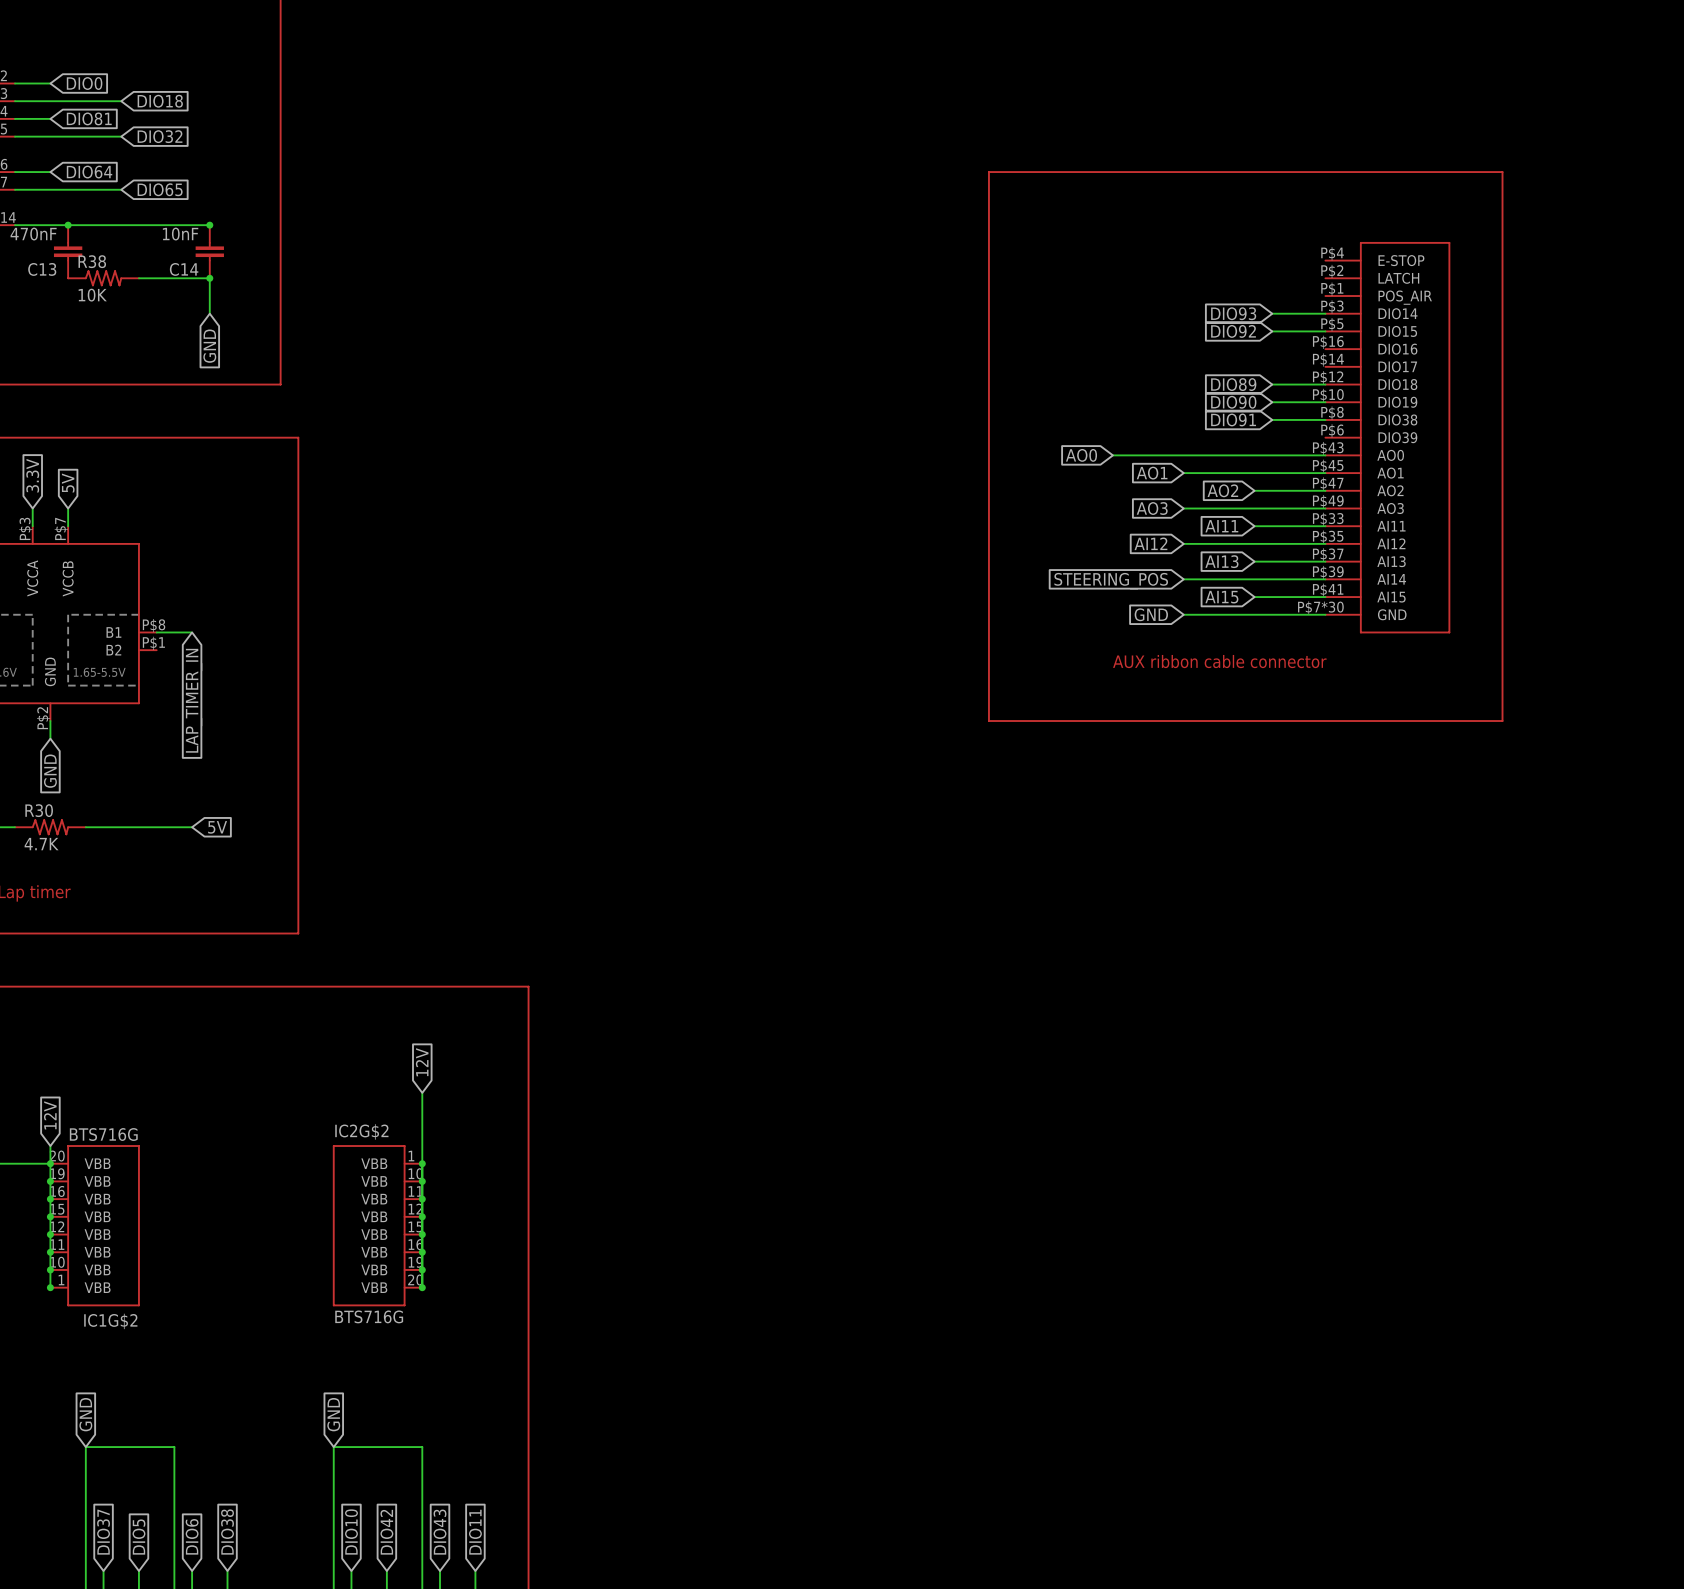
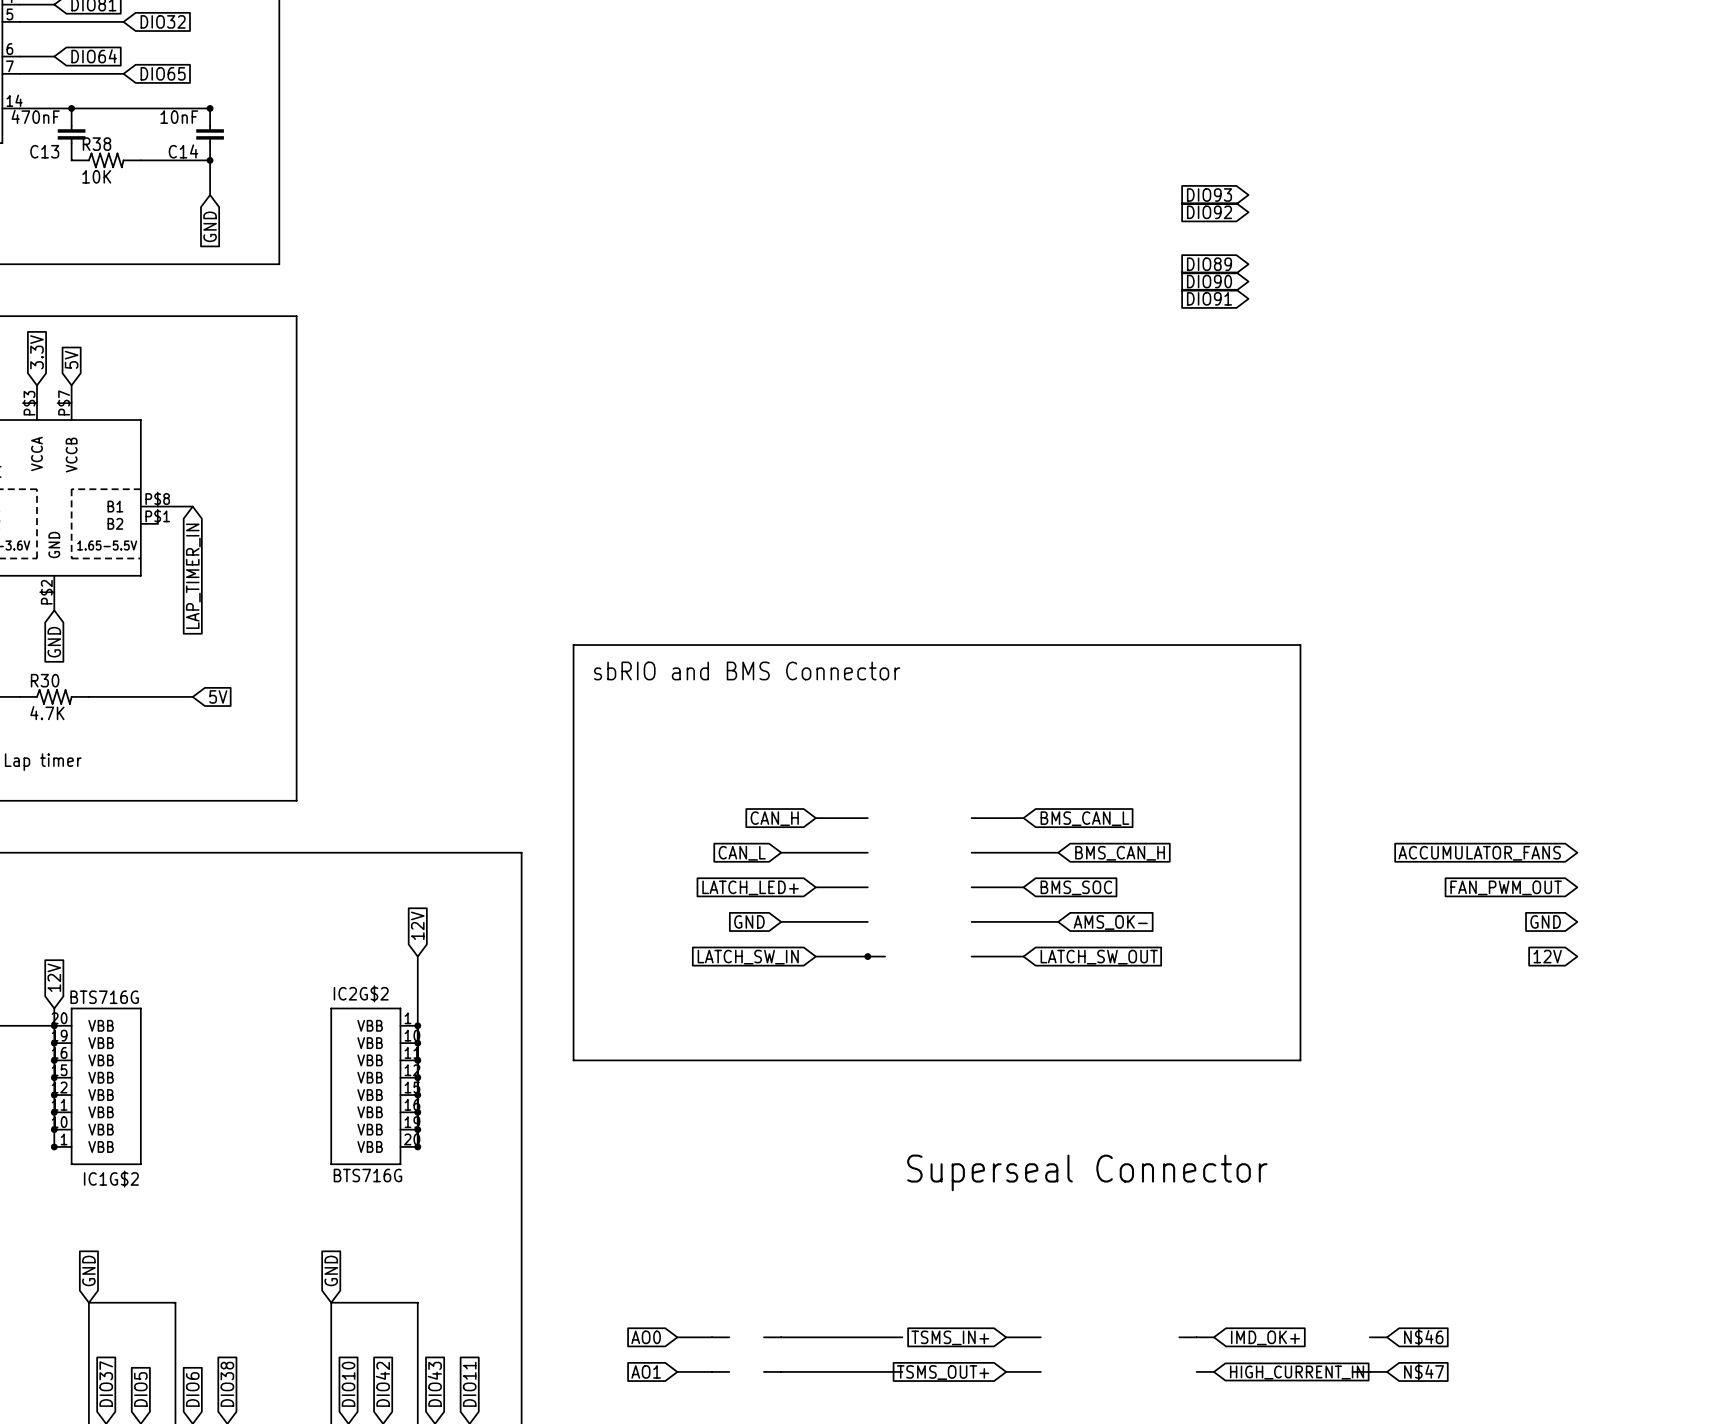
line: (988, 172) (1502, 172) (1502, 721) (988, 721) (988, 172) -> none
wire: (1272, 313) (1325, 313) -> none
wire: (1272, 331) (1325, 331) -> none
wire: (1272, 384) (1325, 384) -> none
wire: (1272, 402) (1325, 402) -> none
wire: (1272, 419) (1325, 419) -> none
part: (1387, 437) -> none
global label: AO0 (1081, 455) -> none
wire: (1112, 455) (1325, 455) -> none
global label: AO1 (1152, 473) -> none
wire: (1183, 473) (1325, 473) -> none
global label: AO2 (1222, 490) -> none
wire: (1254, 490) (1325, 490) -> none
global label: AO3 (1152, 508) -> none
wire: (1183, 508) (1325, 508) -> none
global label: AI11 (1221, 526) -> none
wire: (1254, 526) (1325, 526) -> none
global label: AI12 (1150, 543) -> none
wire: (1183, 543) (1325, 543) -> none
global label: AI13 (1221, 561) -> none
wire: (1254, 561) (1325, 561) -> none
wire: (1183, 579) (1325, 579) -> none
global label: STEERING_POS (1111, 581) -> none
global label: AI15 (1221, 597) -> none
wire: (1254, 597) (1325, 597) -> none
global label: GND (1151, 614) -> none
wire: (1183, 614) (1325, 614) -> none
text: AUX ribbon cable connector (1219, 661) -> none
line: none -> (573, 645) (1300, 645) (1300, 1060) (573, 1060) (573, 645)
text: none -> sbRIO and BMS Connector (747, 670)
wire: none -> (815, 818) (867, 818)
wire: none -> (971, 818) (1023, 818)
global label: none -> CAN_H (774, 818)
global label: none -> BMS_CAN_L (1084, 818)
wire: none -> (781, 852) (867, 852)
wire: none -> (971, 852) (1058, 852)
global label: none -> CAN_L (742, 853)
global label: none -> BMS_CAN_H (1120, 853)
global label: none -> ACCUMULATOR_FANS (1479, 853)
wire: none -> (815, 887) (867, 887)
wire: none -> (971, 887) (1023, 887)
global label: none -> LATCH_LED+ (750, 887)
global label: none -> BMS_SOC (1076, 887)
global label: none -> FAN_PWM_OUT (1506, 887)
global label: none -> GND (749, 921)
wire: none -> (781, 921) (867, 921)
wire: none -> (971, 921) (1058, 921)
global label: none -> GND (1545, 921)
global label: none -> AMS_OK- (1110, 922)
wire: none -> (815, 956) (885, 956)
junction: none -> (867, 956)
wire: none -> (971, 956) (1023, 956)
global label: none -> 12V (1547, 956)
global label: none -> LATCH_SW_IN (748, 957)
global label: none -> LATCH_SW_OUT (1099, 957)
text: none -> Superseal Connector (1087, 1172)
global label: none -> AO0 (646, 1337)
wire: none -> (677, 1337) (729, 1337)
wire: none -> (763, 1337) (902, 1337)
wire: none -> (1006, 1337) (1040, 1337)
wire: none -> (1179, 1337) (1213, 1337)
wire: none -> (1369, 1337) (1387, 1337)
global label: none -> N$46 (1423, 1337)
global label: none -> TSMS_IN+ (950, 1337)
global label: none -> IMD_OK+ (1265, 1337)
global label: none -> AO1 (646, 1371)
wire: none -> (677, 1371) (729, 1371)
wire: none -> (763, 1371) (902, 1371)
wire: none -> (1006, 1371) (1040, 1371)
wire: none -> (1196, 1371) (1213, 1371)
wire: none -> (1352, 1371) (1387, 1371)
global label: none -> N$47 (1424, 1371)
global label: none -> TSMS_OUT+ (943, 1372)
global label: none -> HIGH_CURRENT_IN (1297, 1372)

